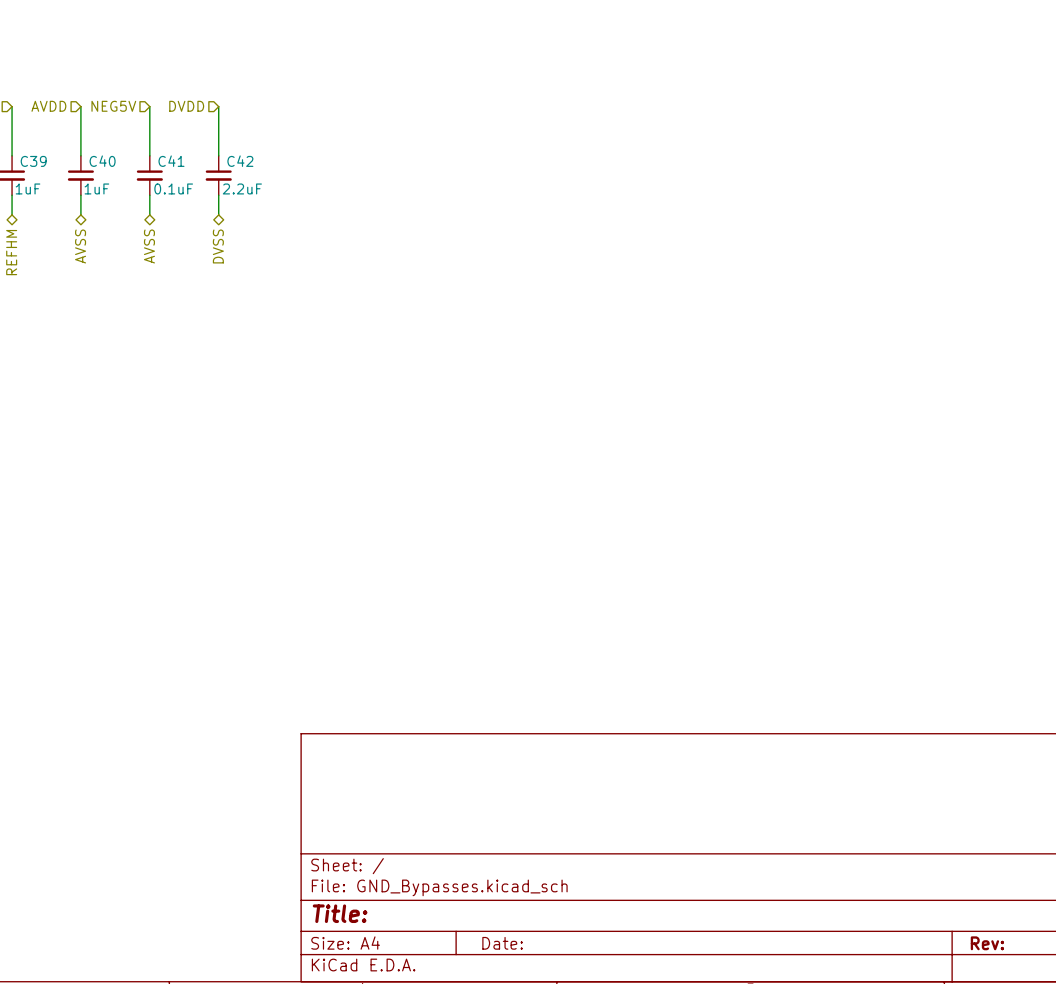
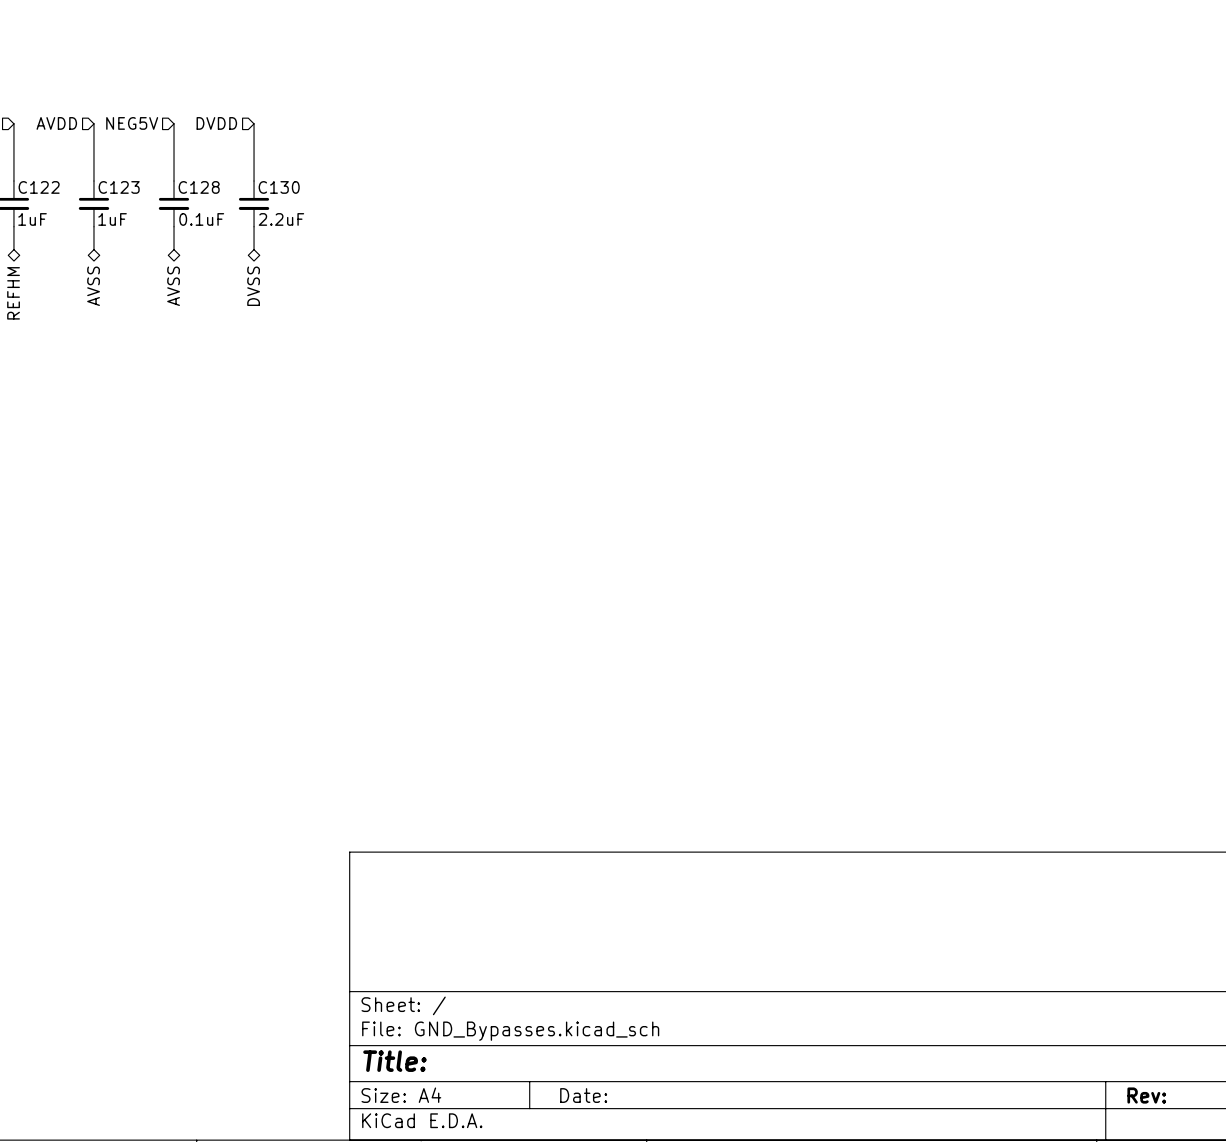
C39 name: C39 (33, 161) -> C122 (39, 187)
C40 name: C40 (102, 161) -> C123 (119, 187)
C41 name: C41 (171, 161) -> C128 (199, 187)
C42 name: C42 (240, 161) -> C130 (279, 187)

